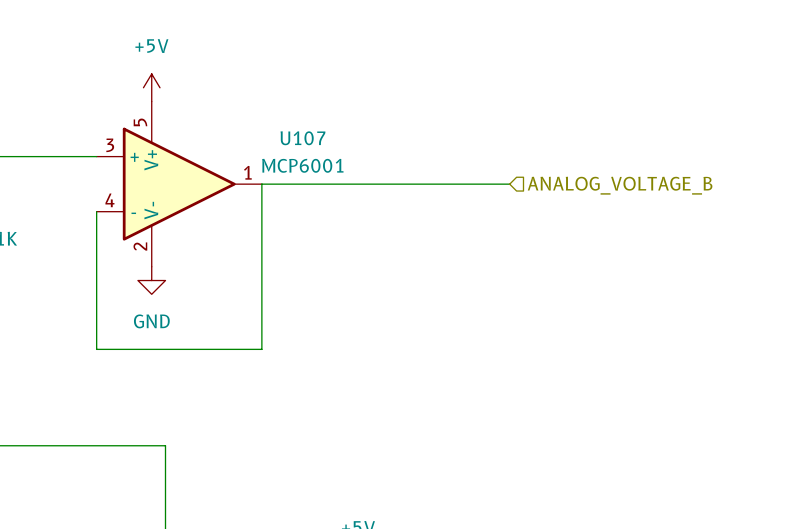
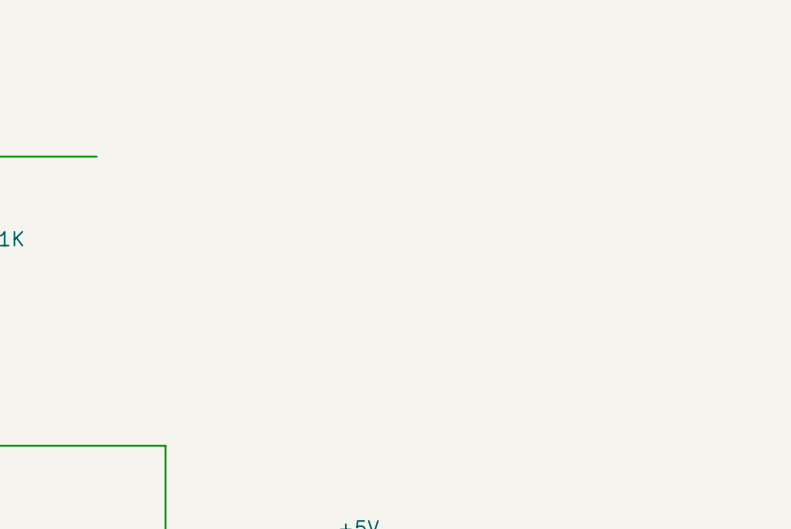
power symbol: +5V (151, 87) -> none
U107: MCP6001 (179, 184) -> none
wire: (509, 184) (261, 184) (261, 349) (96, 349) (96, 211) -> none
hierarchical label: ANALOG_VOLTAGE_B (620, 185) -> none
power symbol: GND (151, 280) -> none

